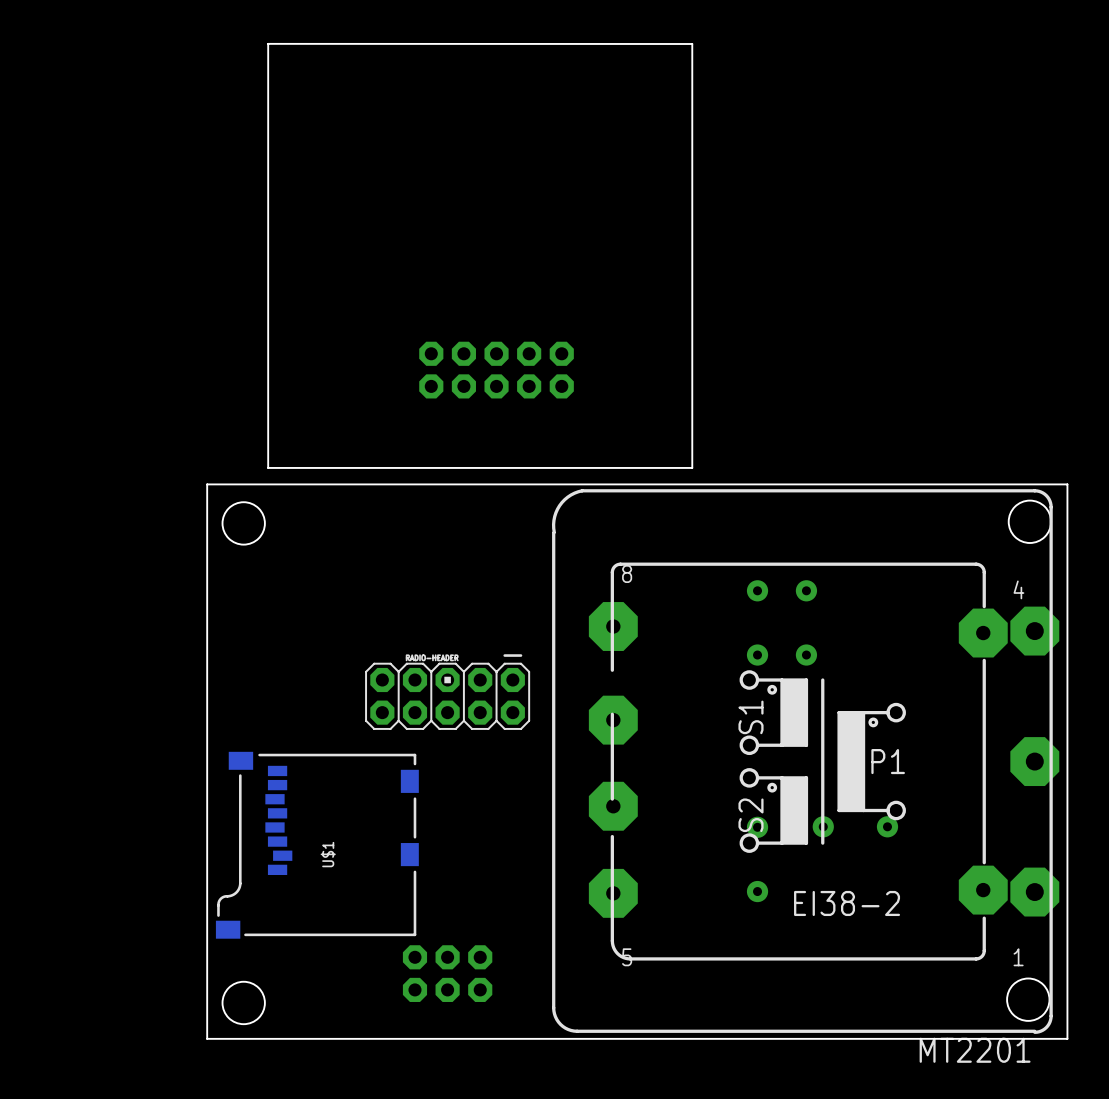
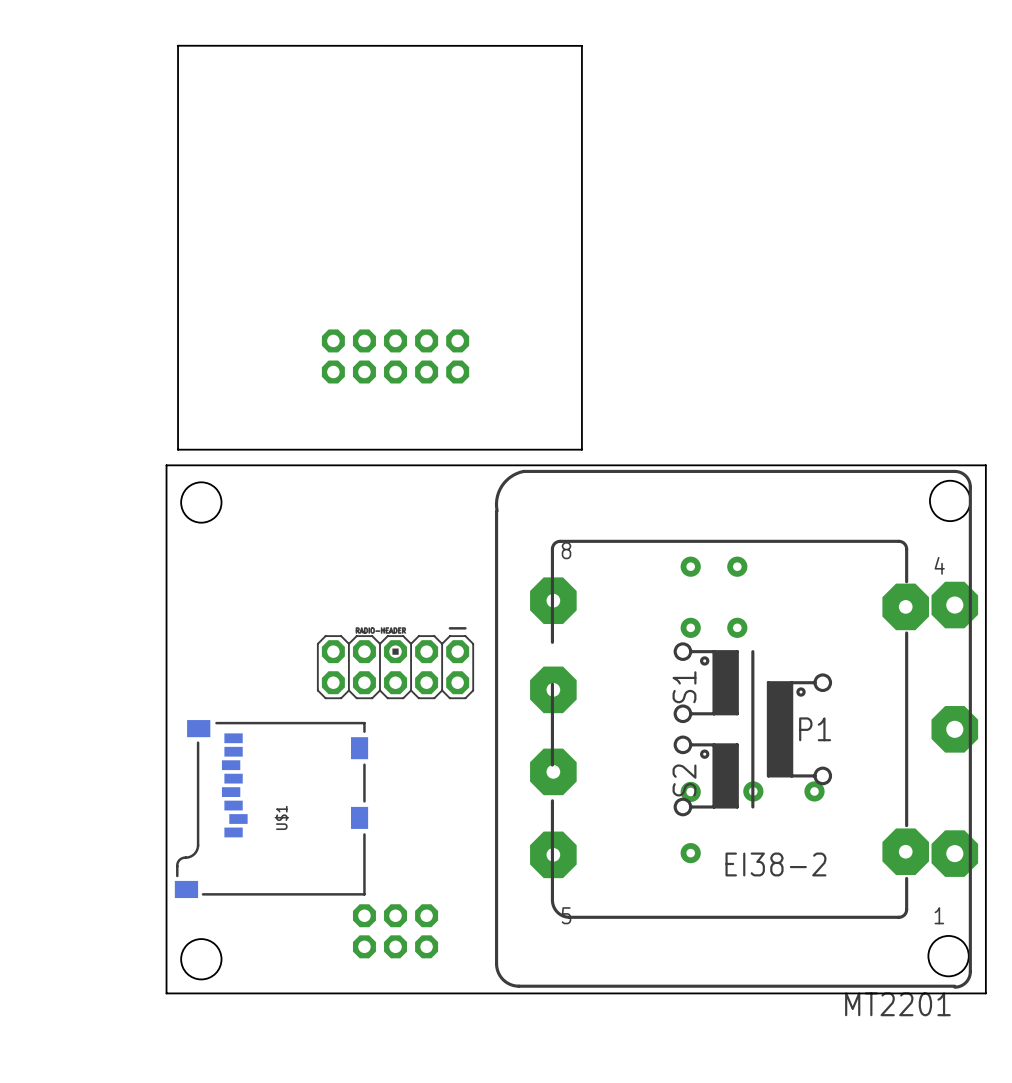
board edge: (268, 43) (268, 467) -> (224, 45) (178, 45) (178, 449) (224, 449)
board edge: (643, 43) (692, 43) (692, 467) (643, 467) -> (581, 45) (581, 449)
part position: (496, 370) -> (395, 356)

